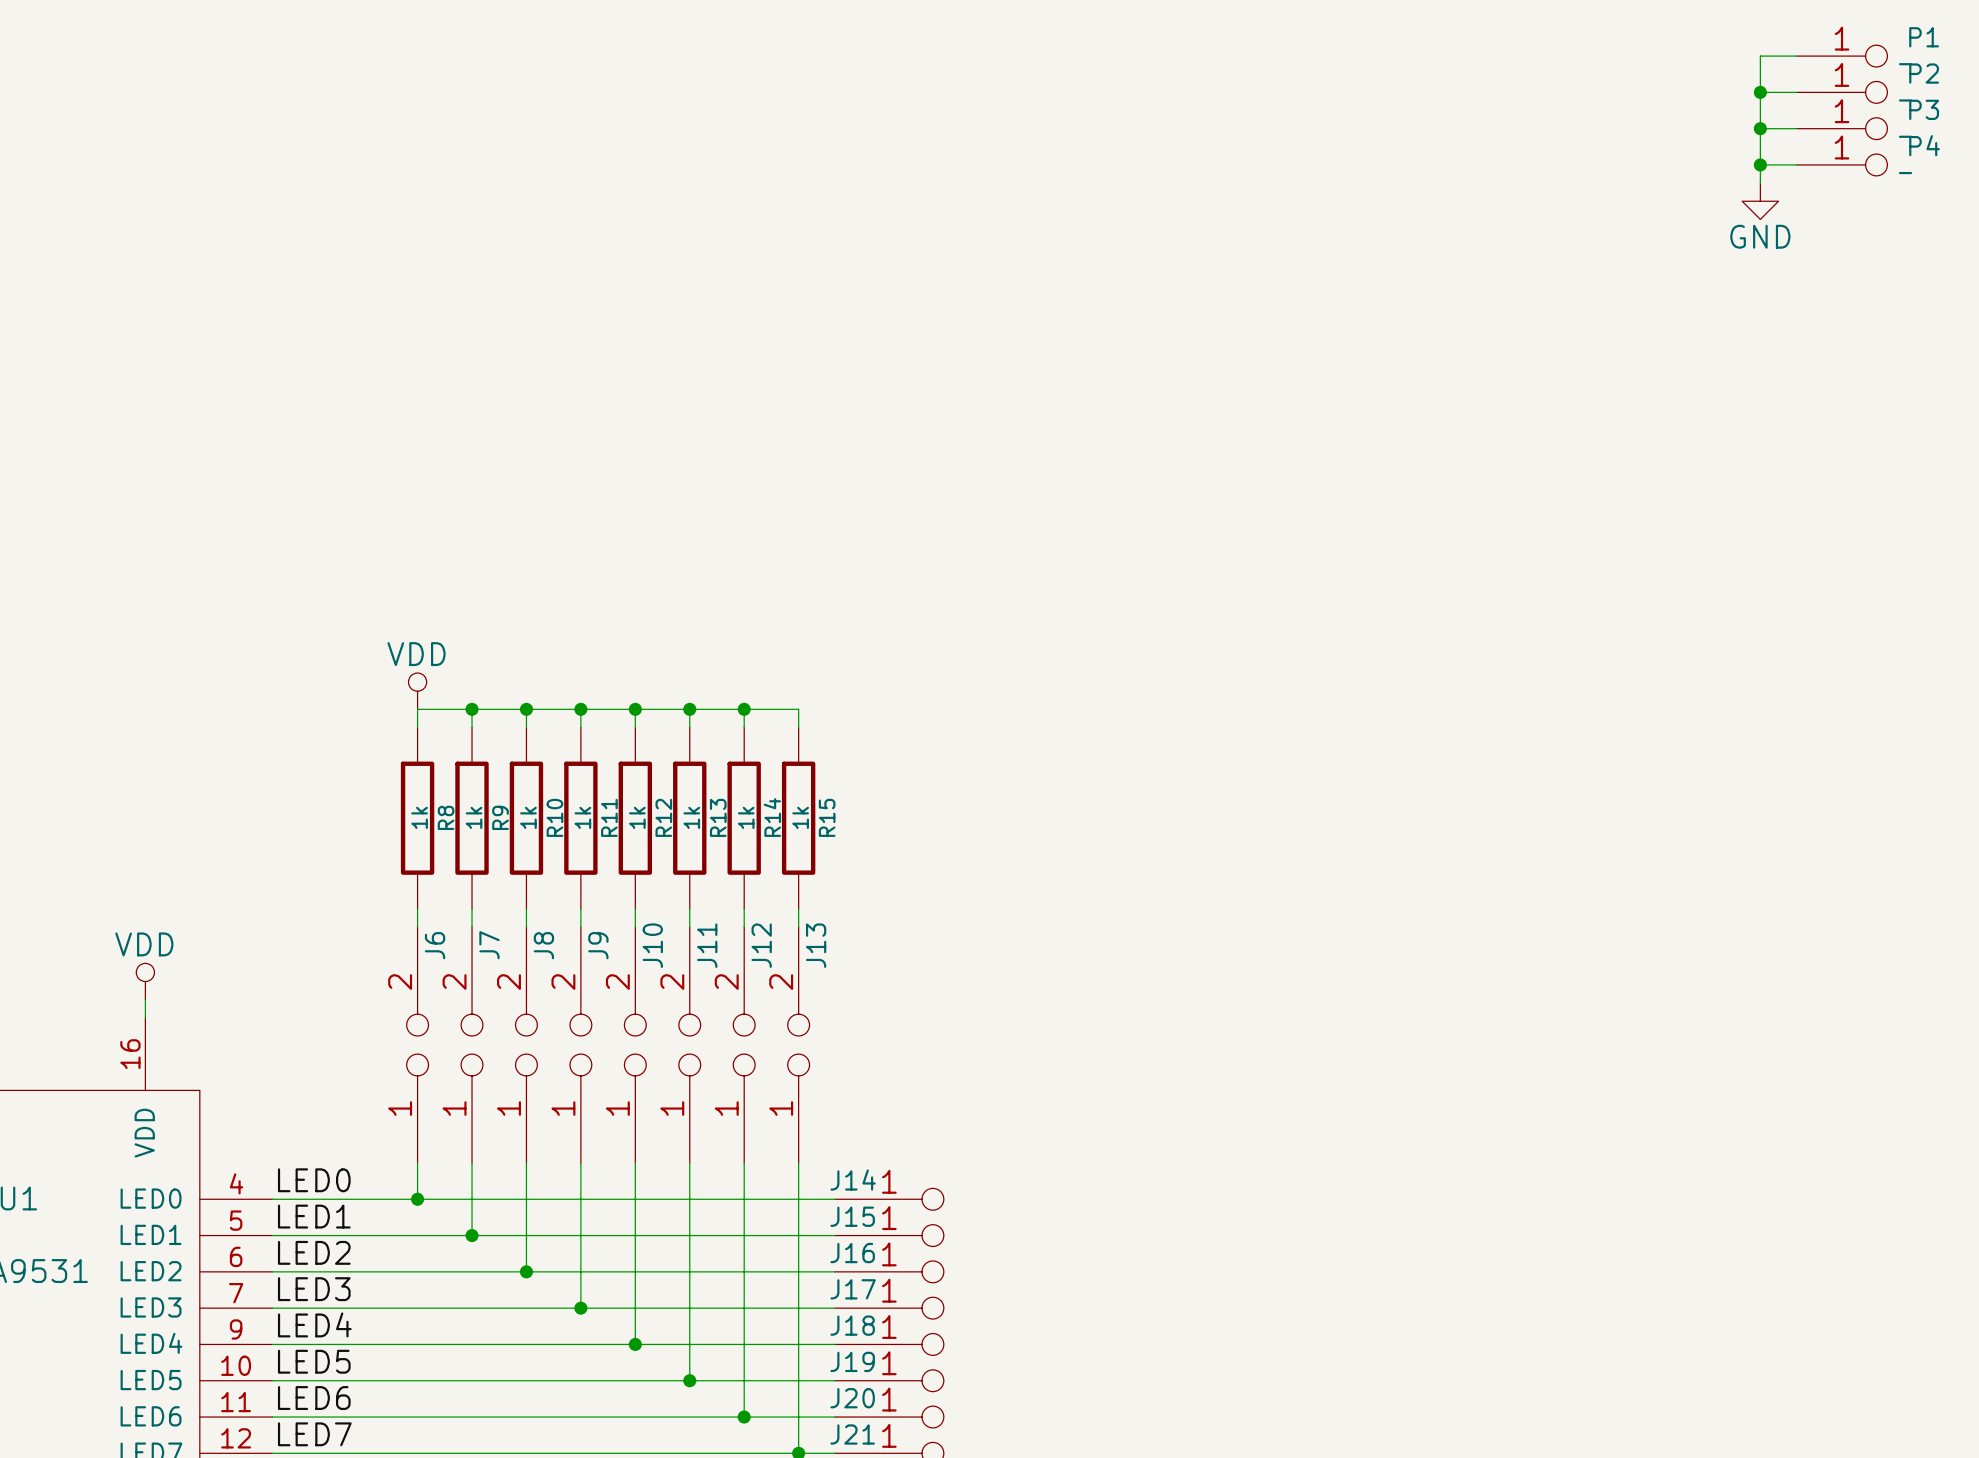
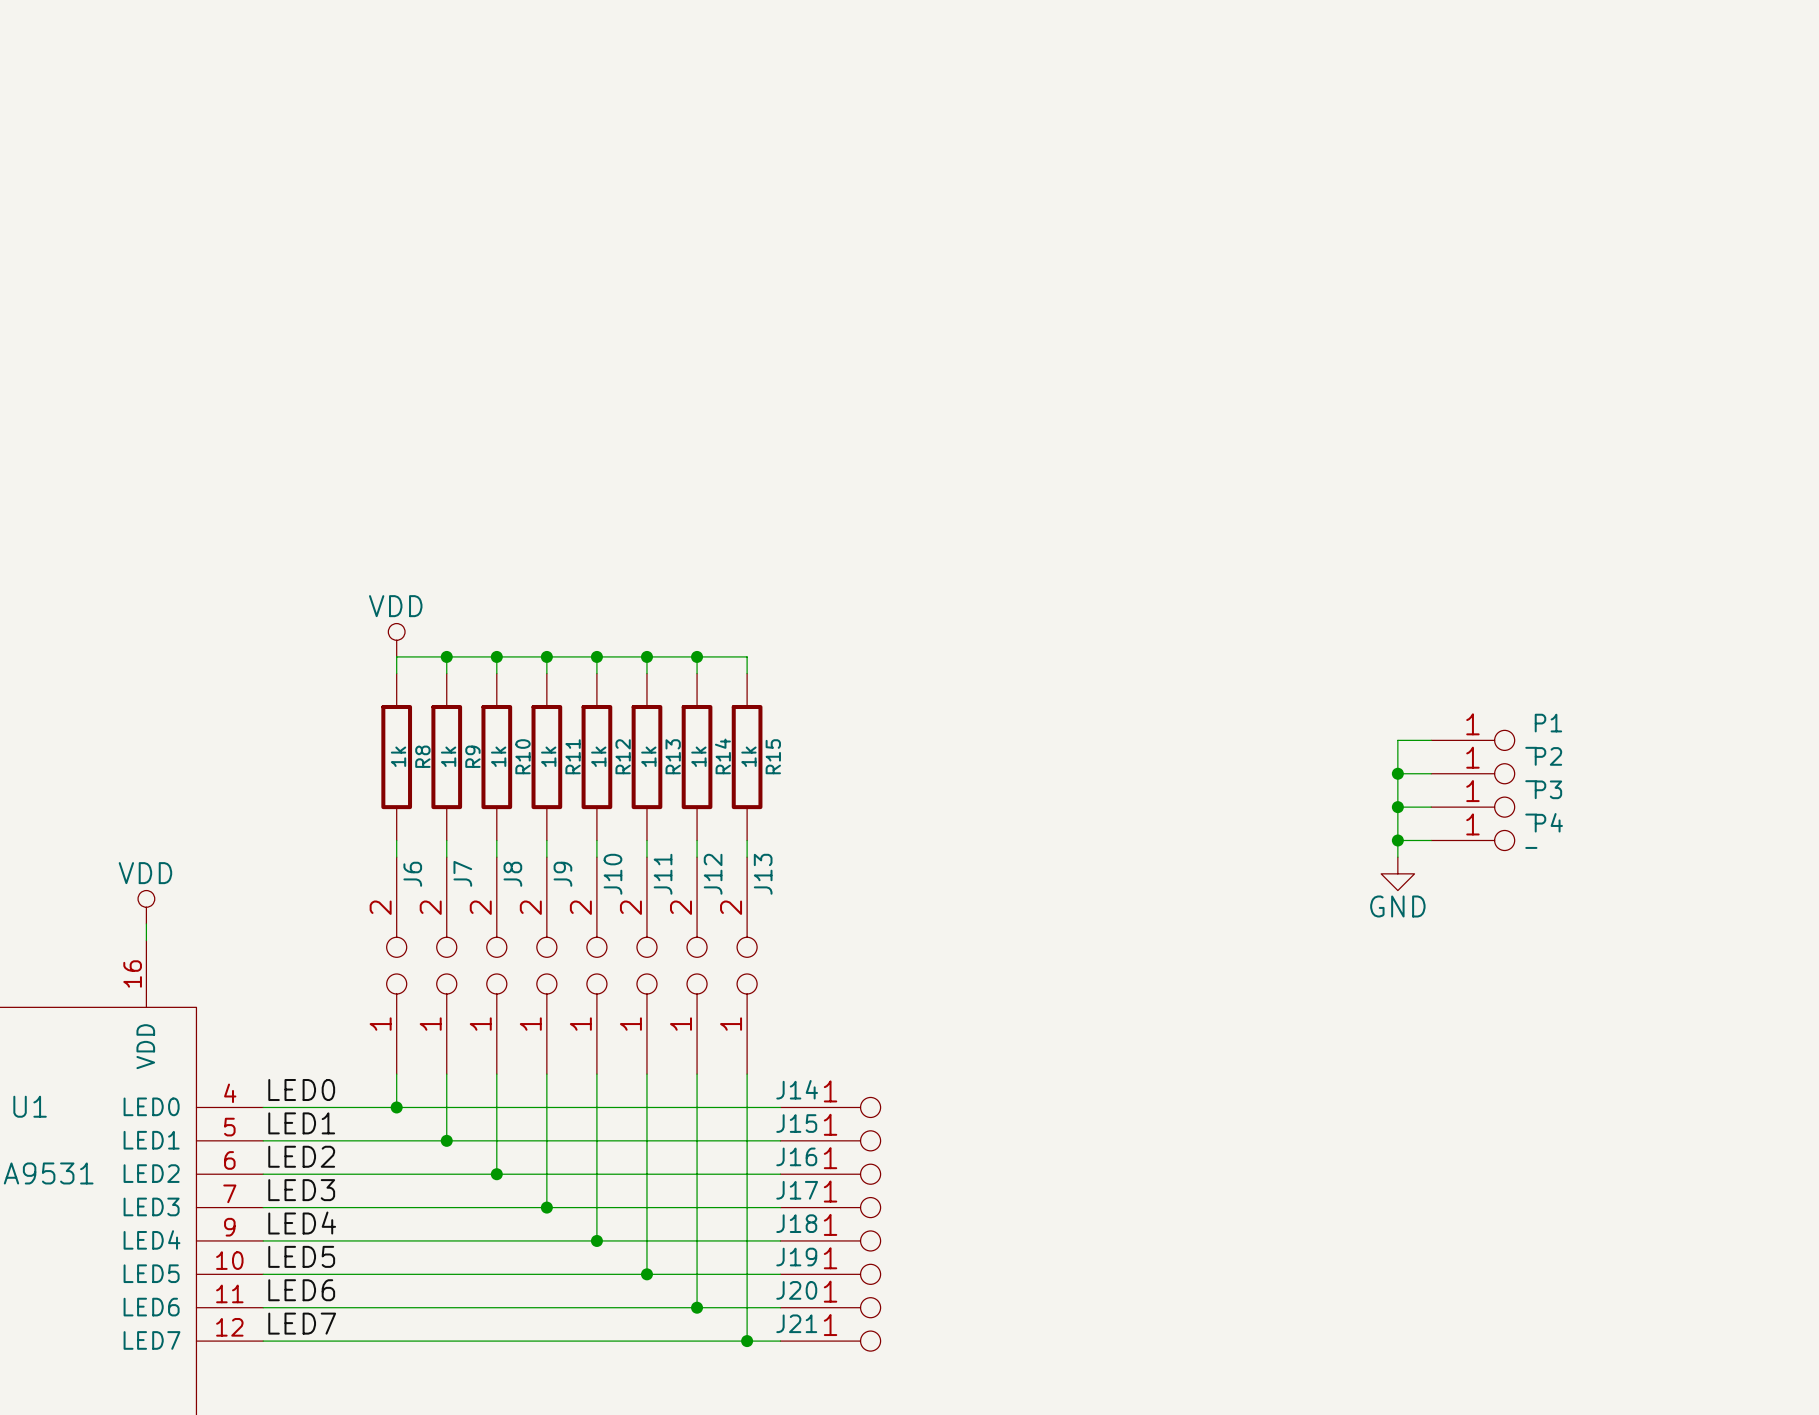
wire: (1796, 56) (1760, 56) (1760, 183) -> none
P1 position: (1842, 56) -> (1472, 740)
wire: (1760, 92) (1796, 92) -> none
junction: (1760, 92) -> none
P2 position: (1842, 92) -> (1472, 773)
wire: (1760, 128) (1796, 128) -> none
junction: (1760, 128) -> none
P3 position: (1842, 128) -> (1472, 807)
wire: (1760, 164) (1796, 164) -> none
junction: (1760, 164) -> none
P4 position: (1842, 164) -> (1472, 840)
power symbol: GND (1760, 201) -> none
wire: none -> (1431, 740) (1397, 740) (1397, 857)
wire: none -> (1397, 773) (1431, 773)
junction: none -> (1397, 773)
wire: none -> (1397, 807) (1431, 807)
junction: none -> (1397, 807)
wire: none -> (1397, 840) (1431, 840)
junction: none -> (1397, 840)
power symbol: none -> GND (1397, 873)

